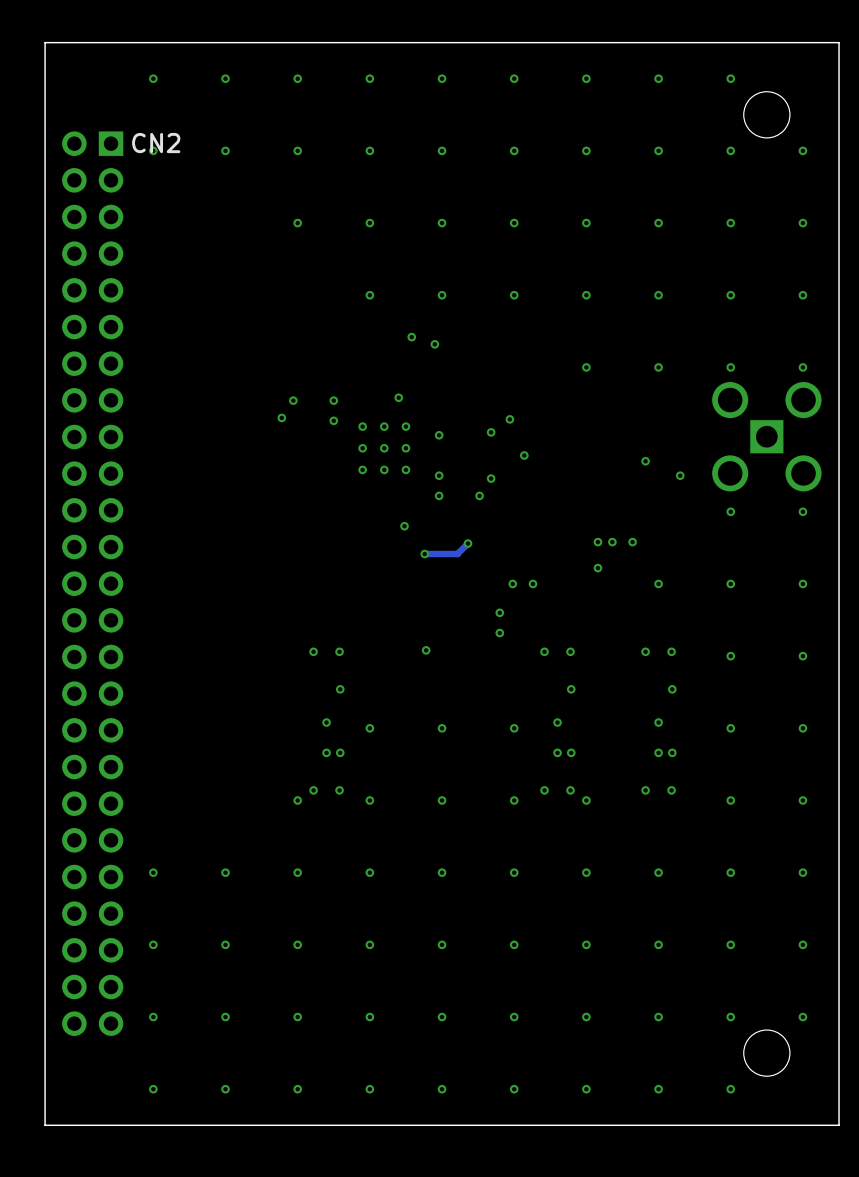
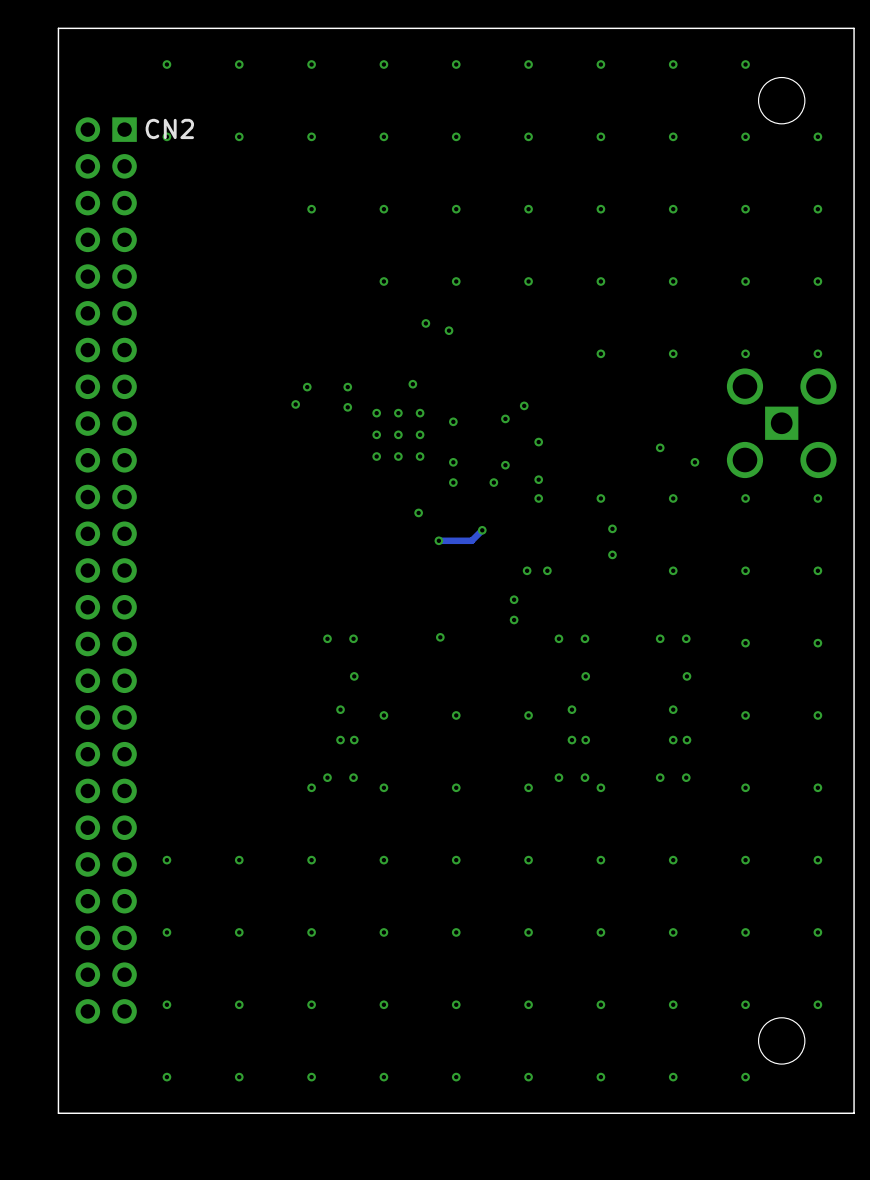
via: none -> (538, 479)
via: none -> (538, 498)
via: none -> (600, 498)
via: none -> (673, 498)
via: (612, 542) -> none
via: (632, 542) -> none

